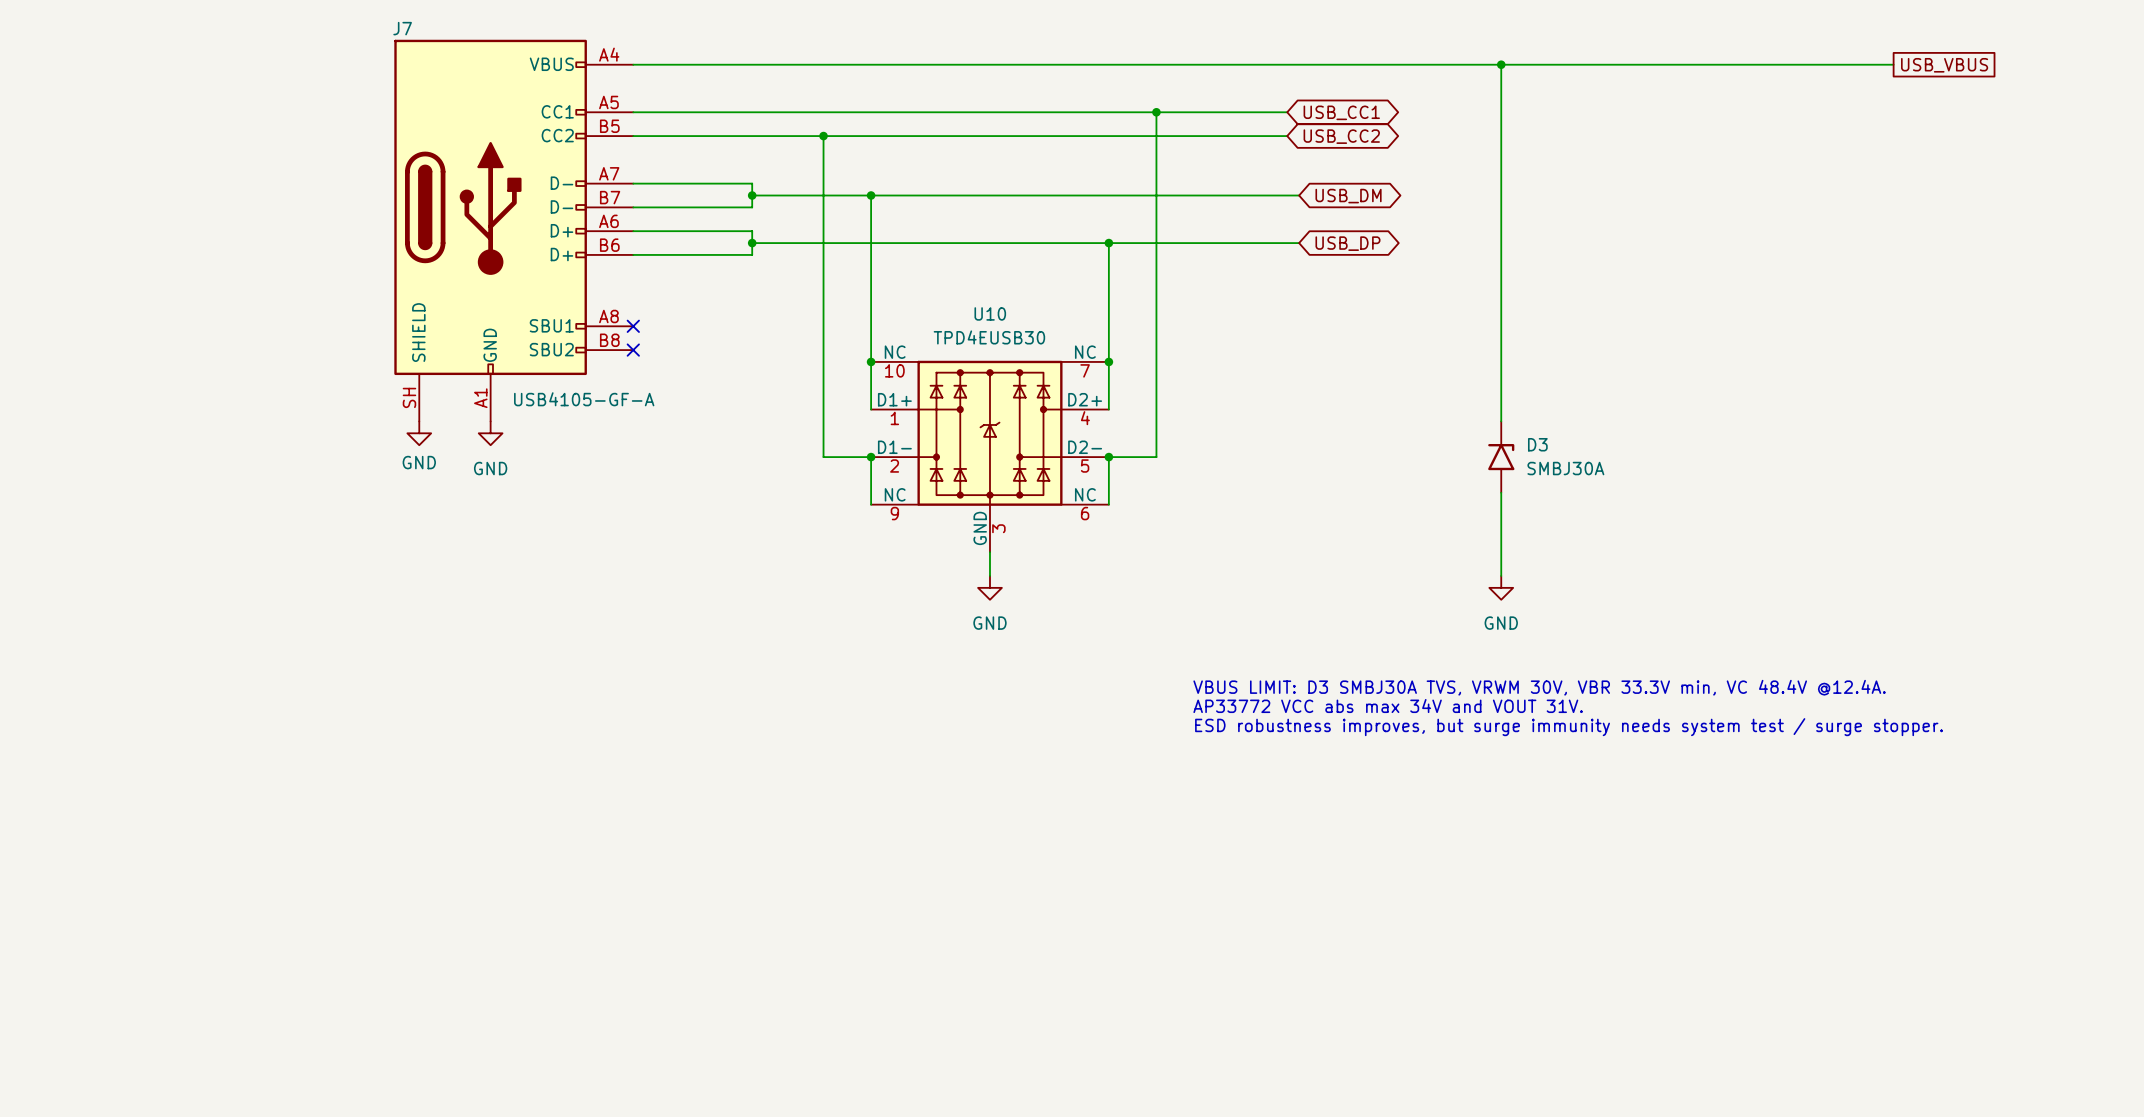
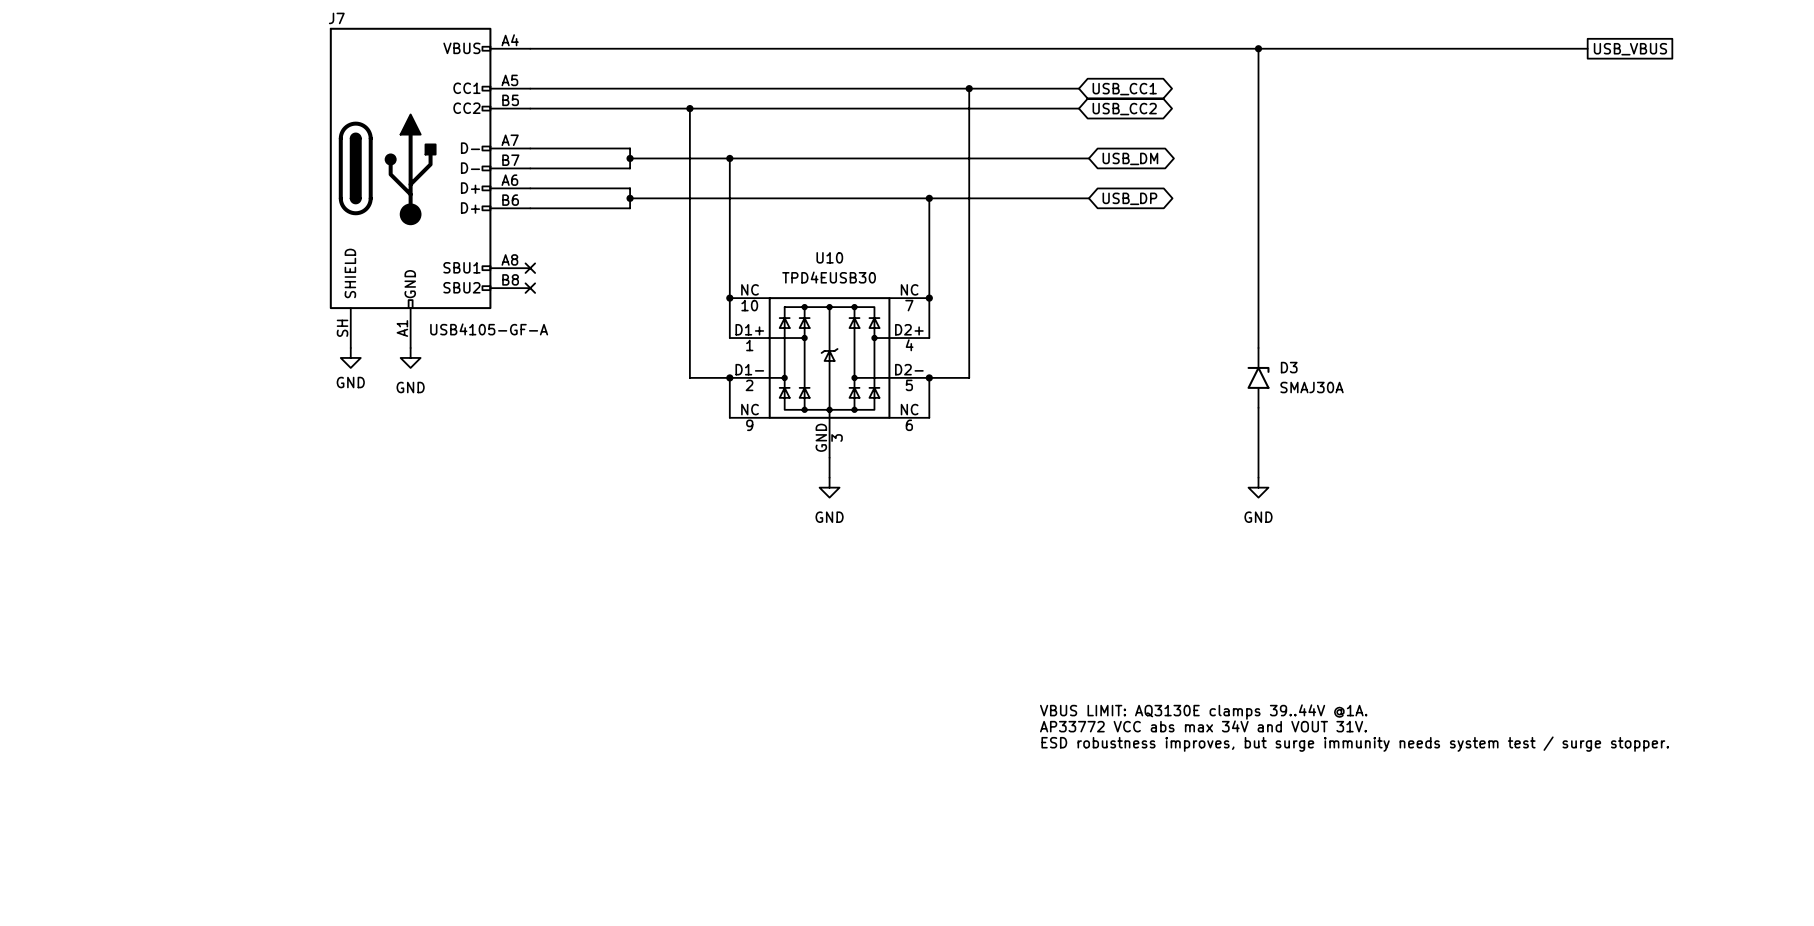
D3 value: SMBJ30A (1565, 468) -> SMAJ30A (1312, 387)
text: VBUS LIMIT: D3 SMBJ30A TVS, VRWM 30V, VBR 33.3V min, VC 48.4V @12.4A. (1539, 687) -> none
text position: AP33772 VCC abs max 34V and VOUT 31V. (1388, 706) -> AP33772 VCC abs max 34V and VOUT 31V. (1203, 726)
text position: ESD robustness improves, but surge immunity needs system test / surge stopper. (1568, 727) -> ESD robustness improves, but surge immunity needs system test / surge stopper. (1355, 744)
text: none -> VBUS LIMIT: AQ3130E clamps 39..44V @1A. (1203, 712)

